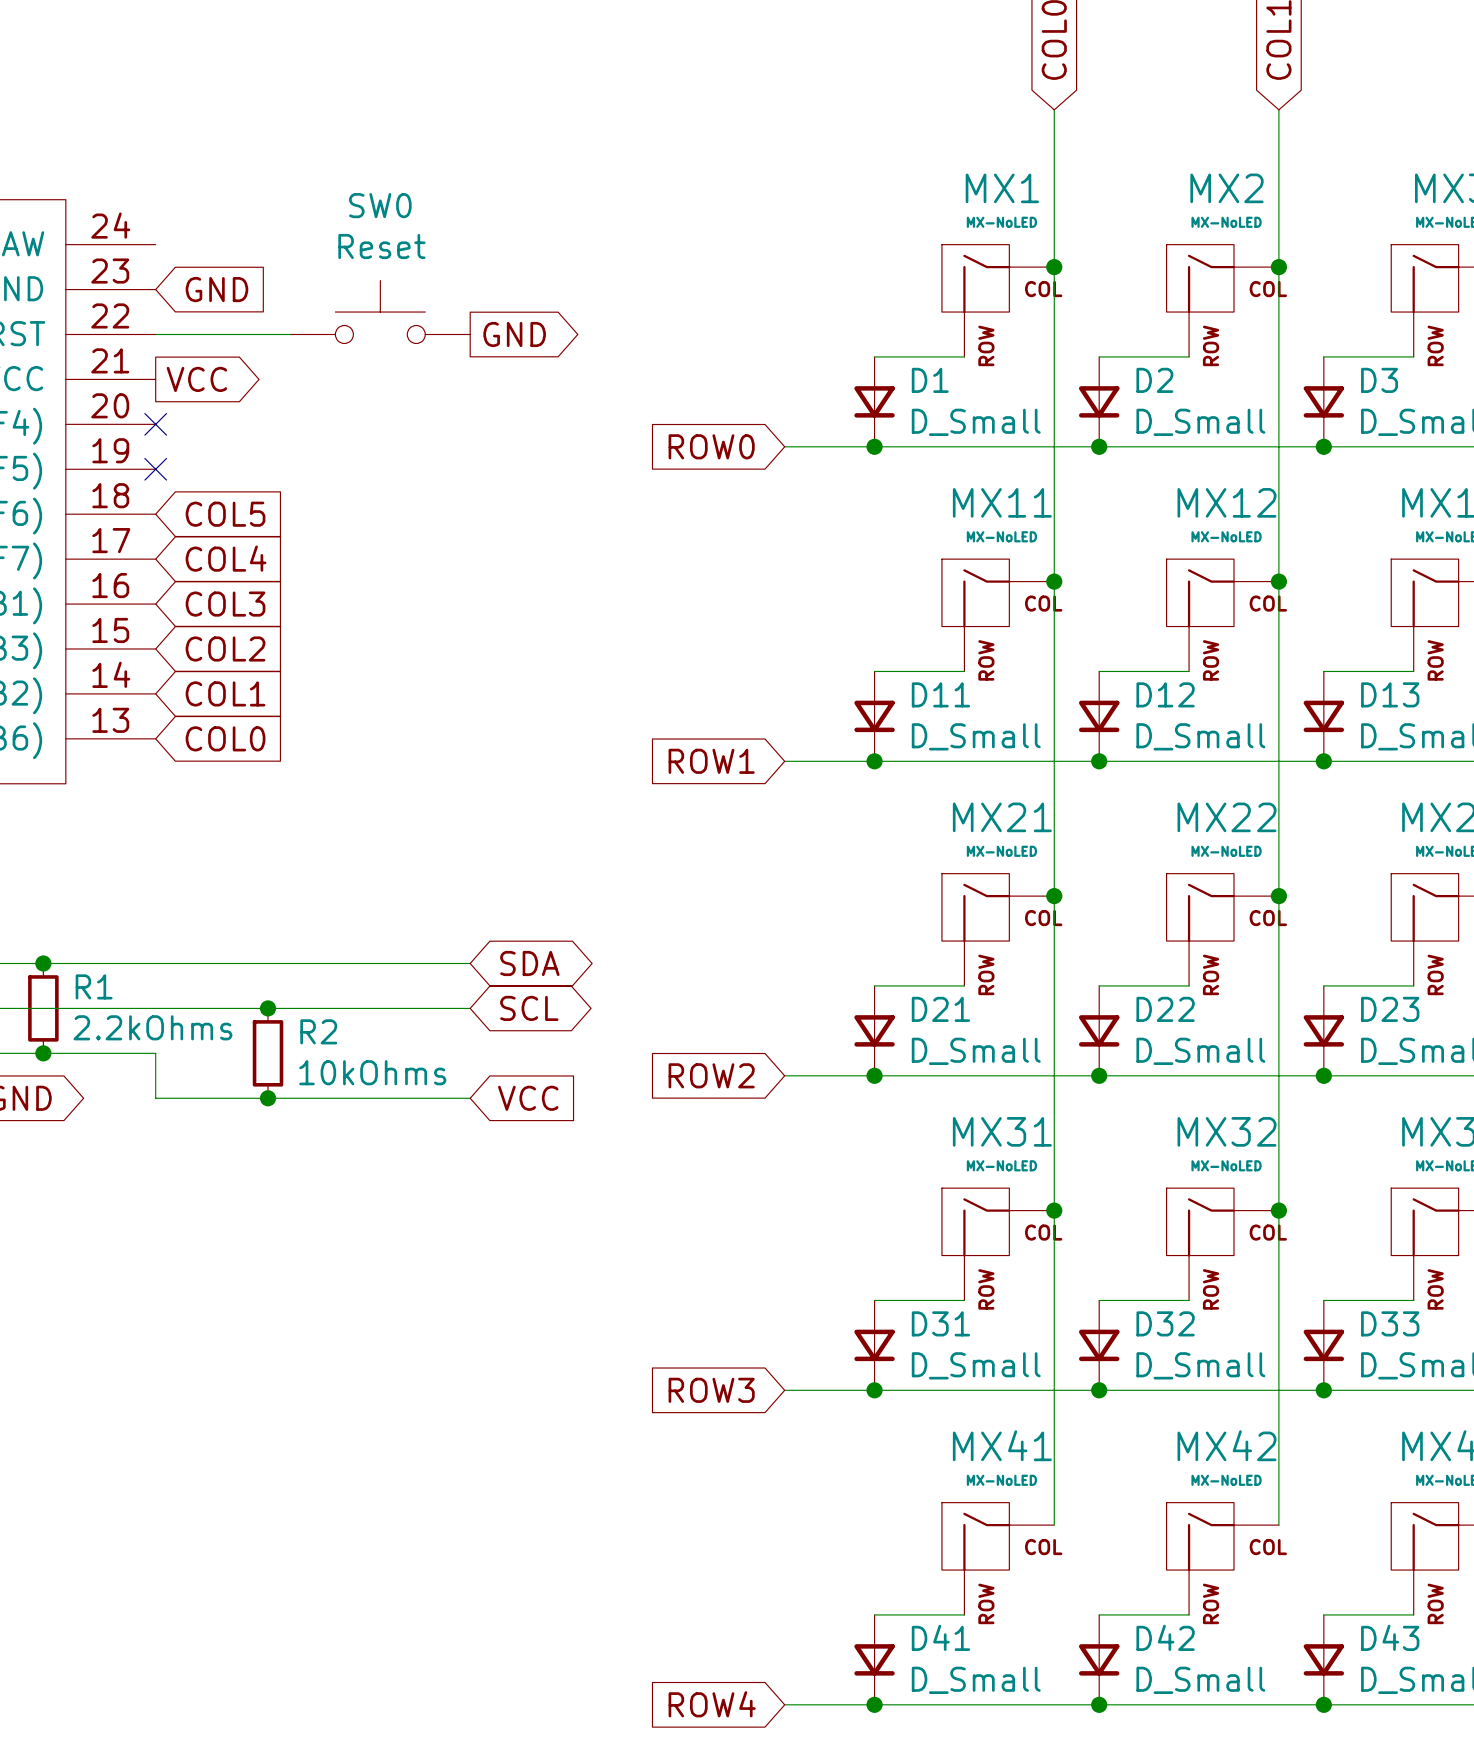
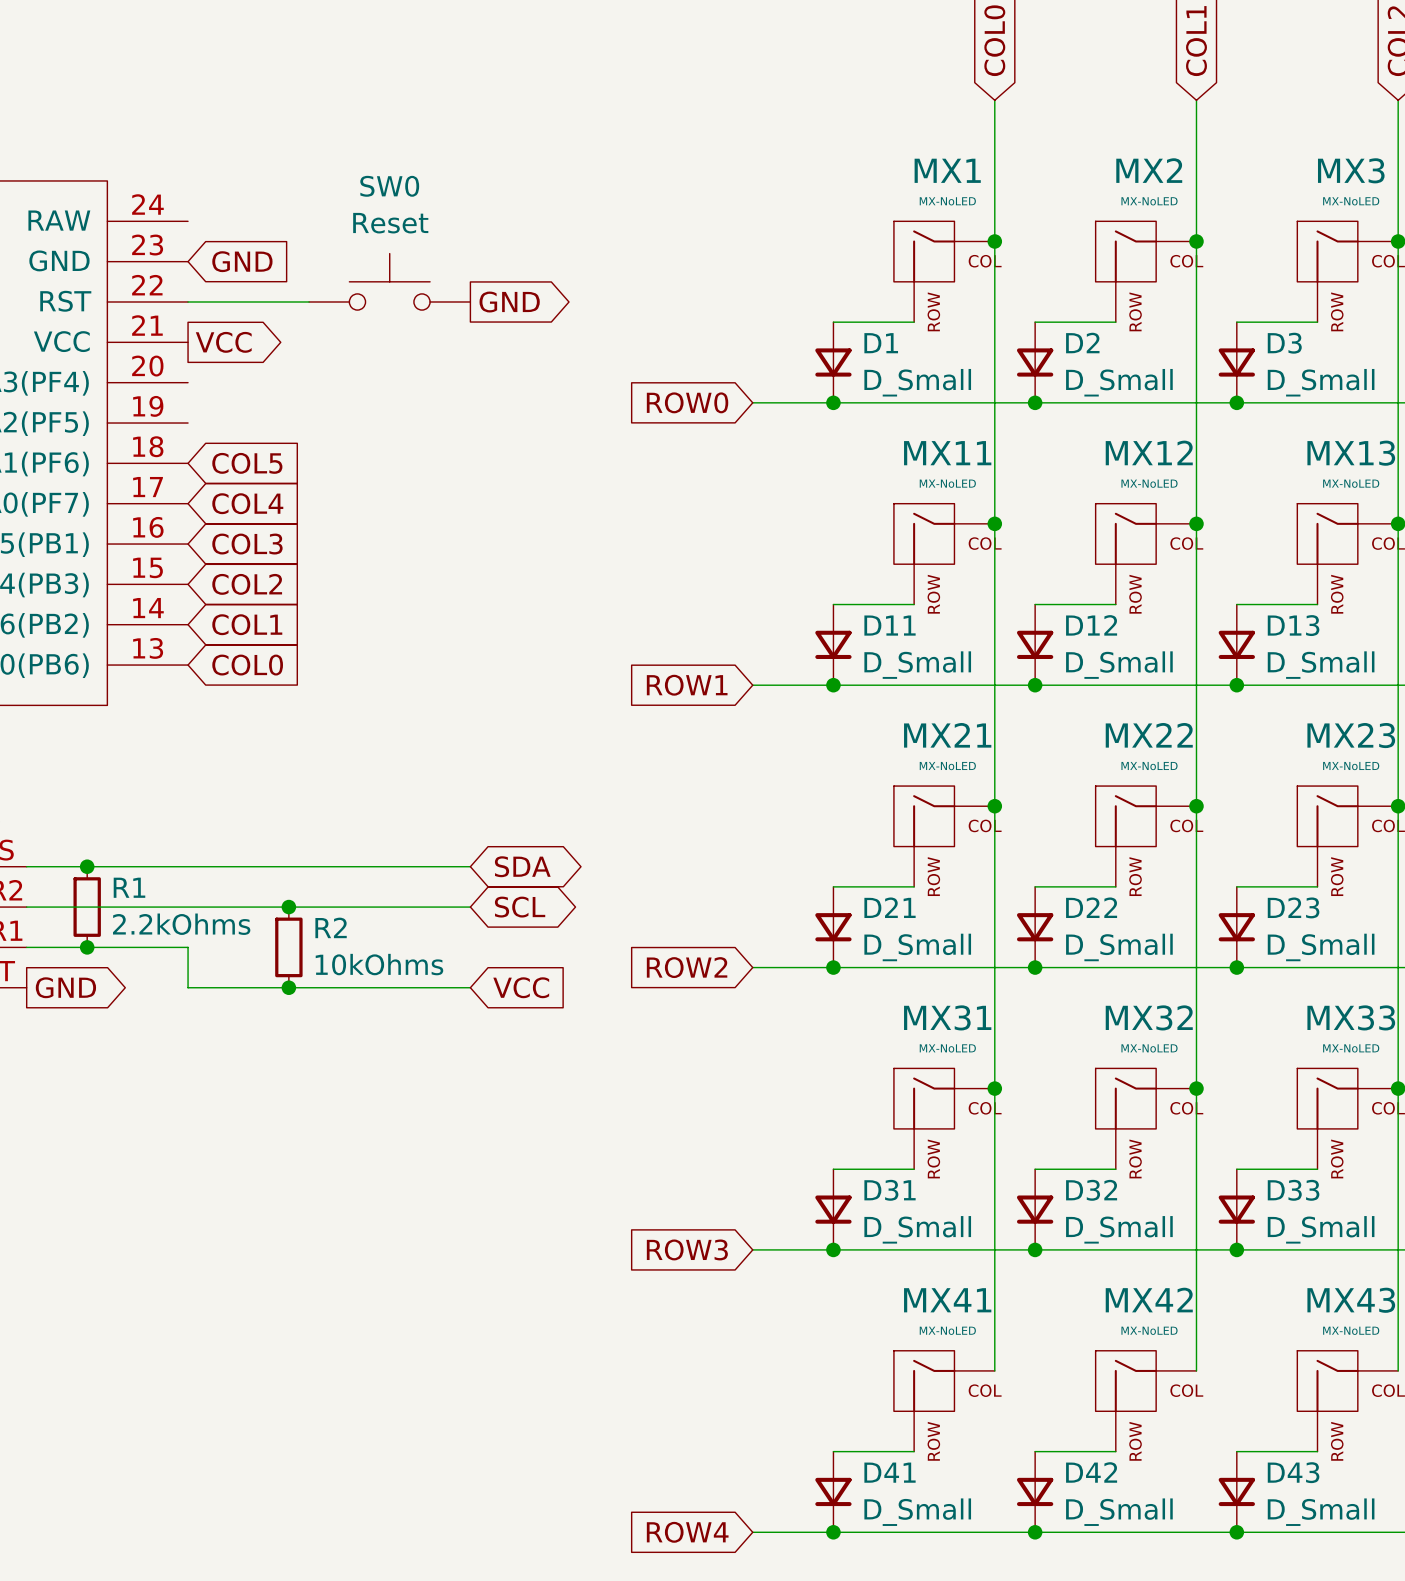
no-connect mark: (155, 424) -> none
no-connect mark: (155, 469) -> none

